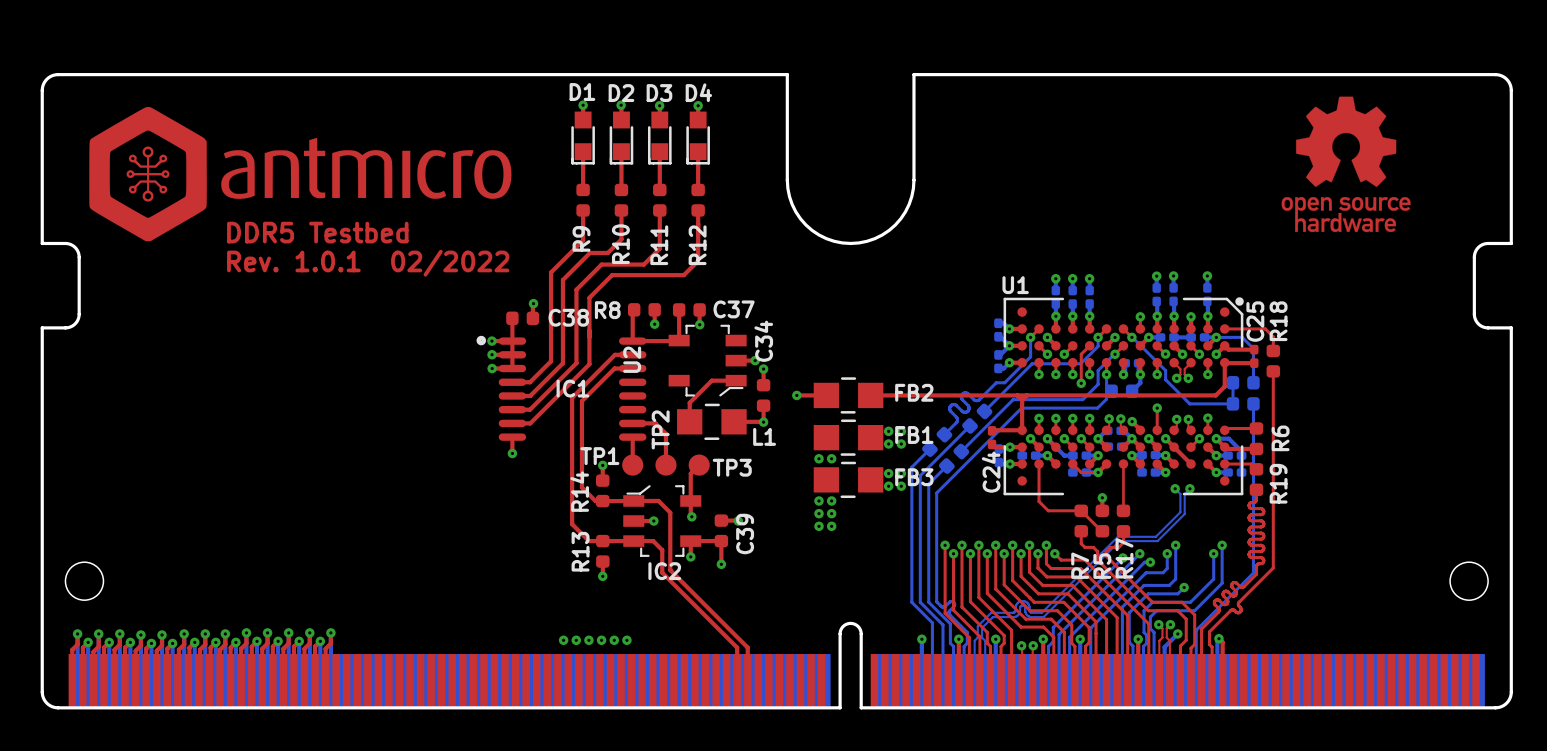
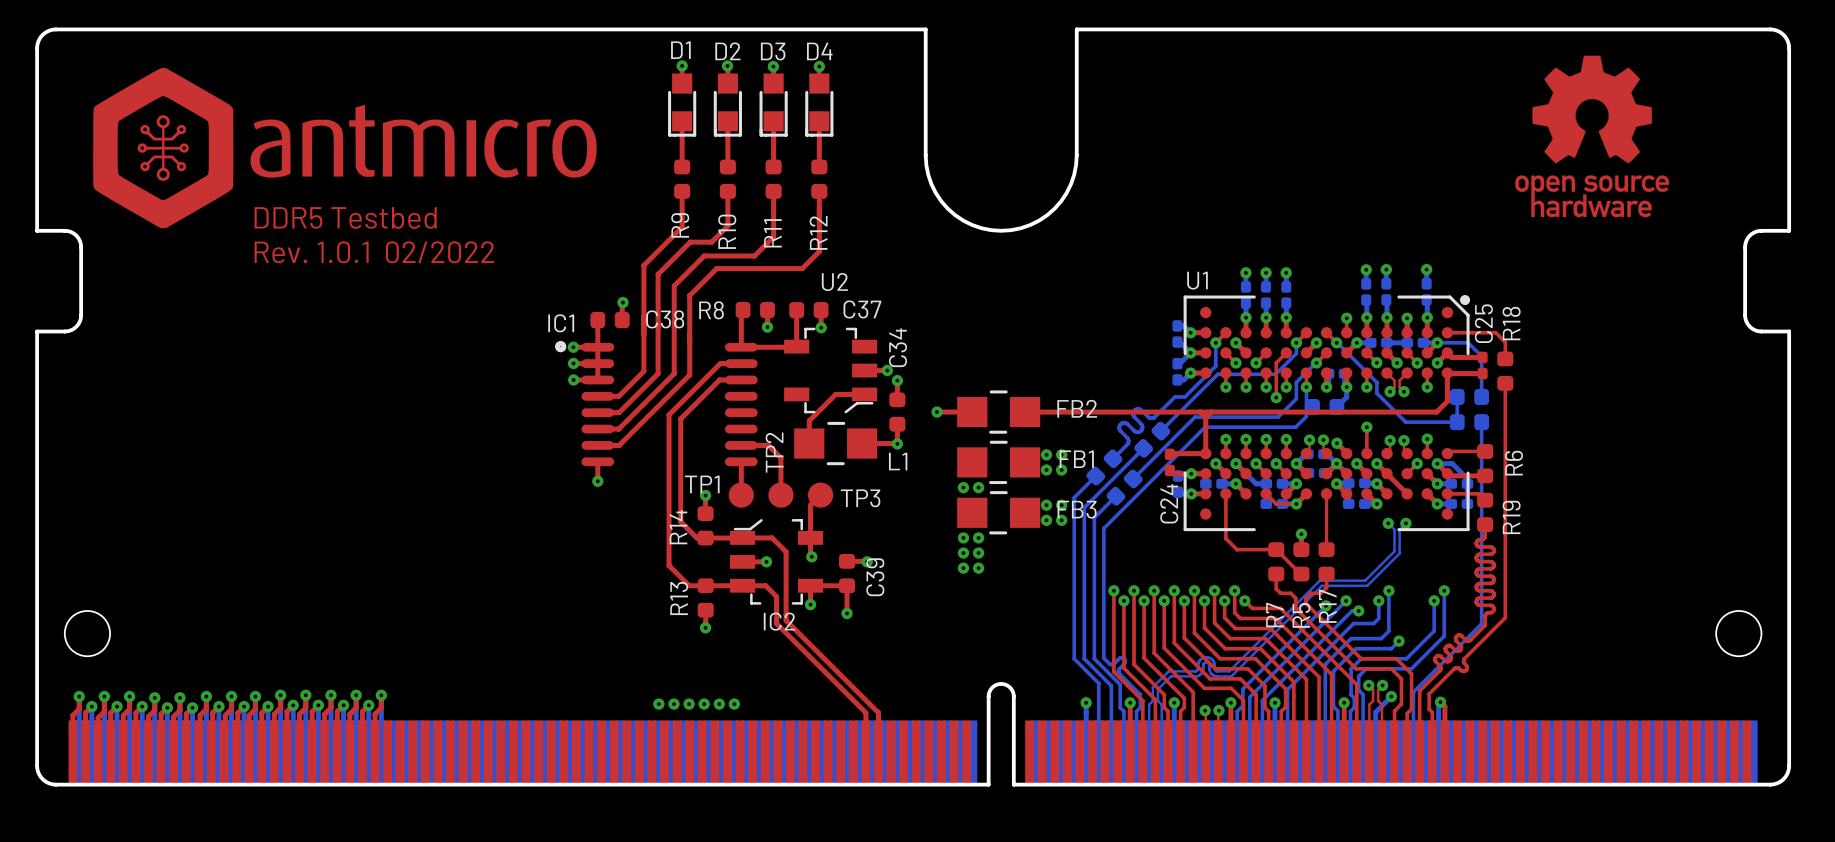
U2 name rotation: 0° (632, 359) -> 90° clockwise (834, 282)
U2 name position: U2 (632, 359) -> U2 (834, 282)
IC1 name position: IC1 (572, 388) -> IC1 (561, 323)

